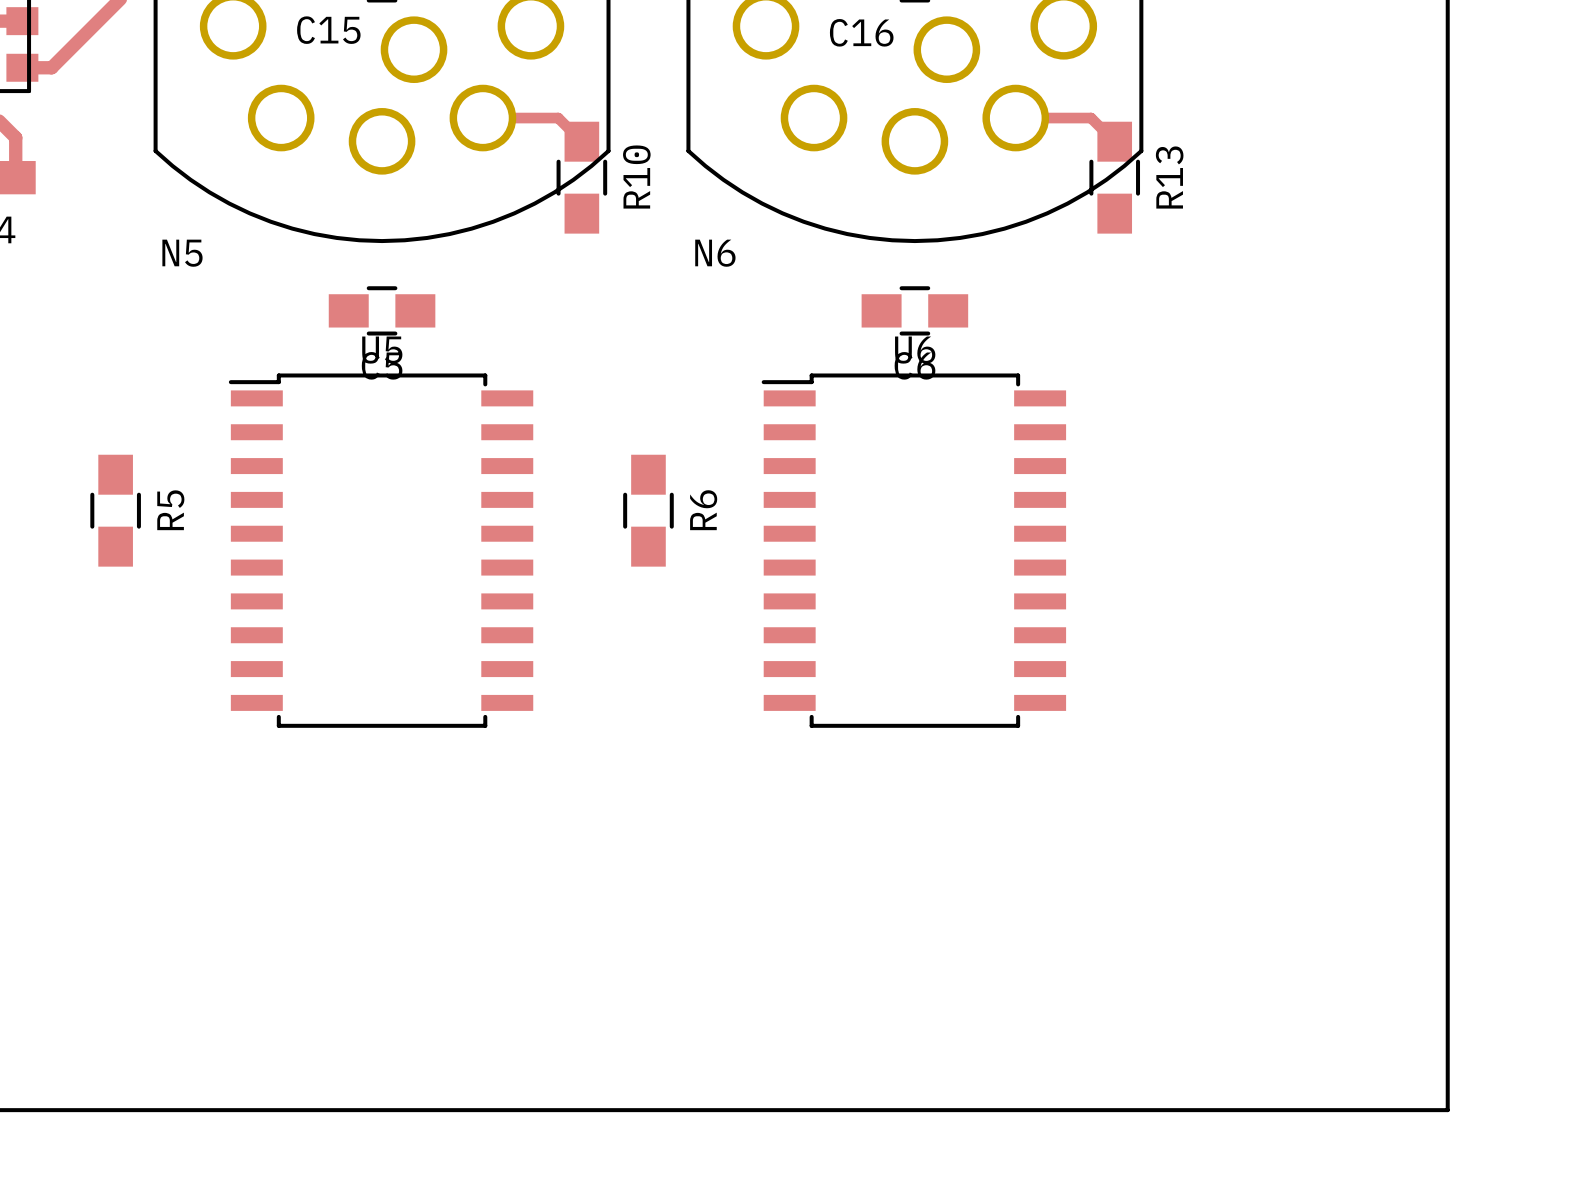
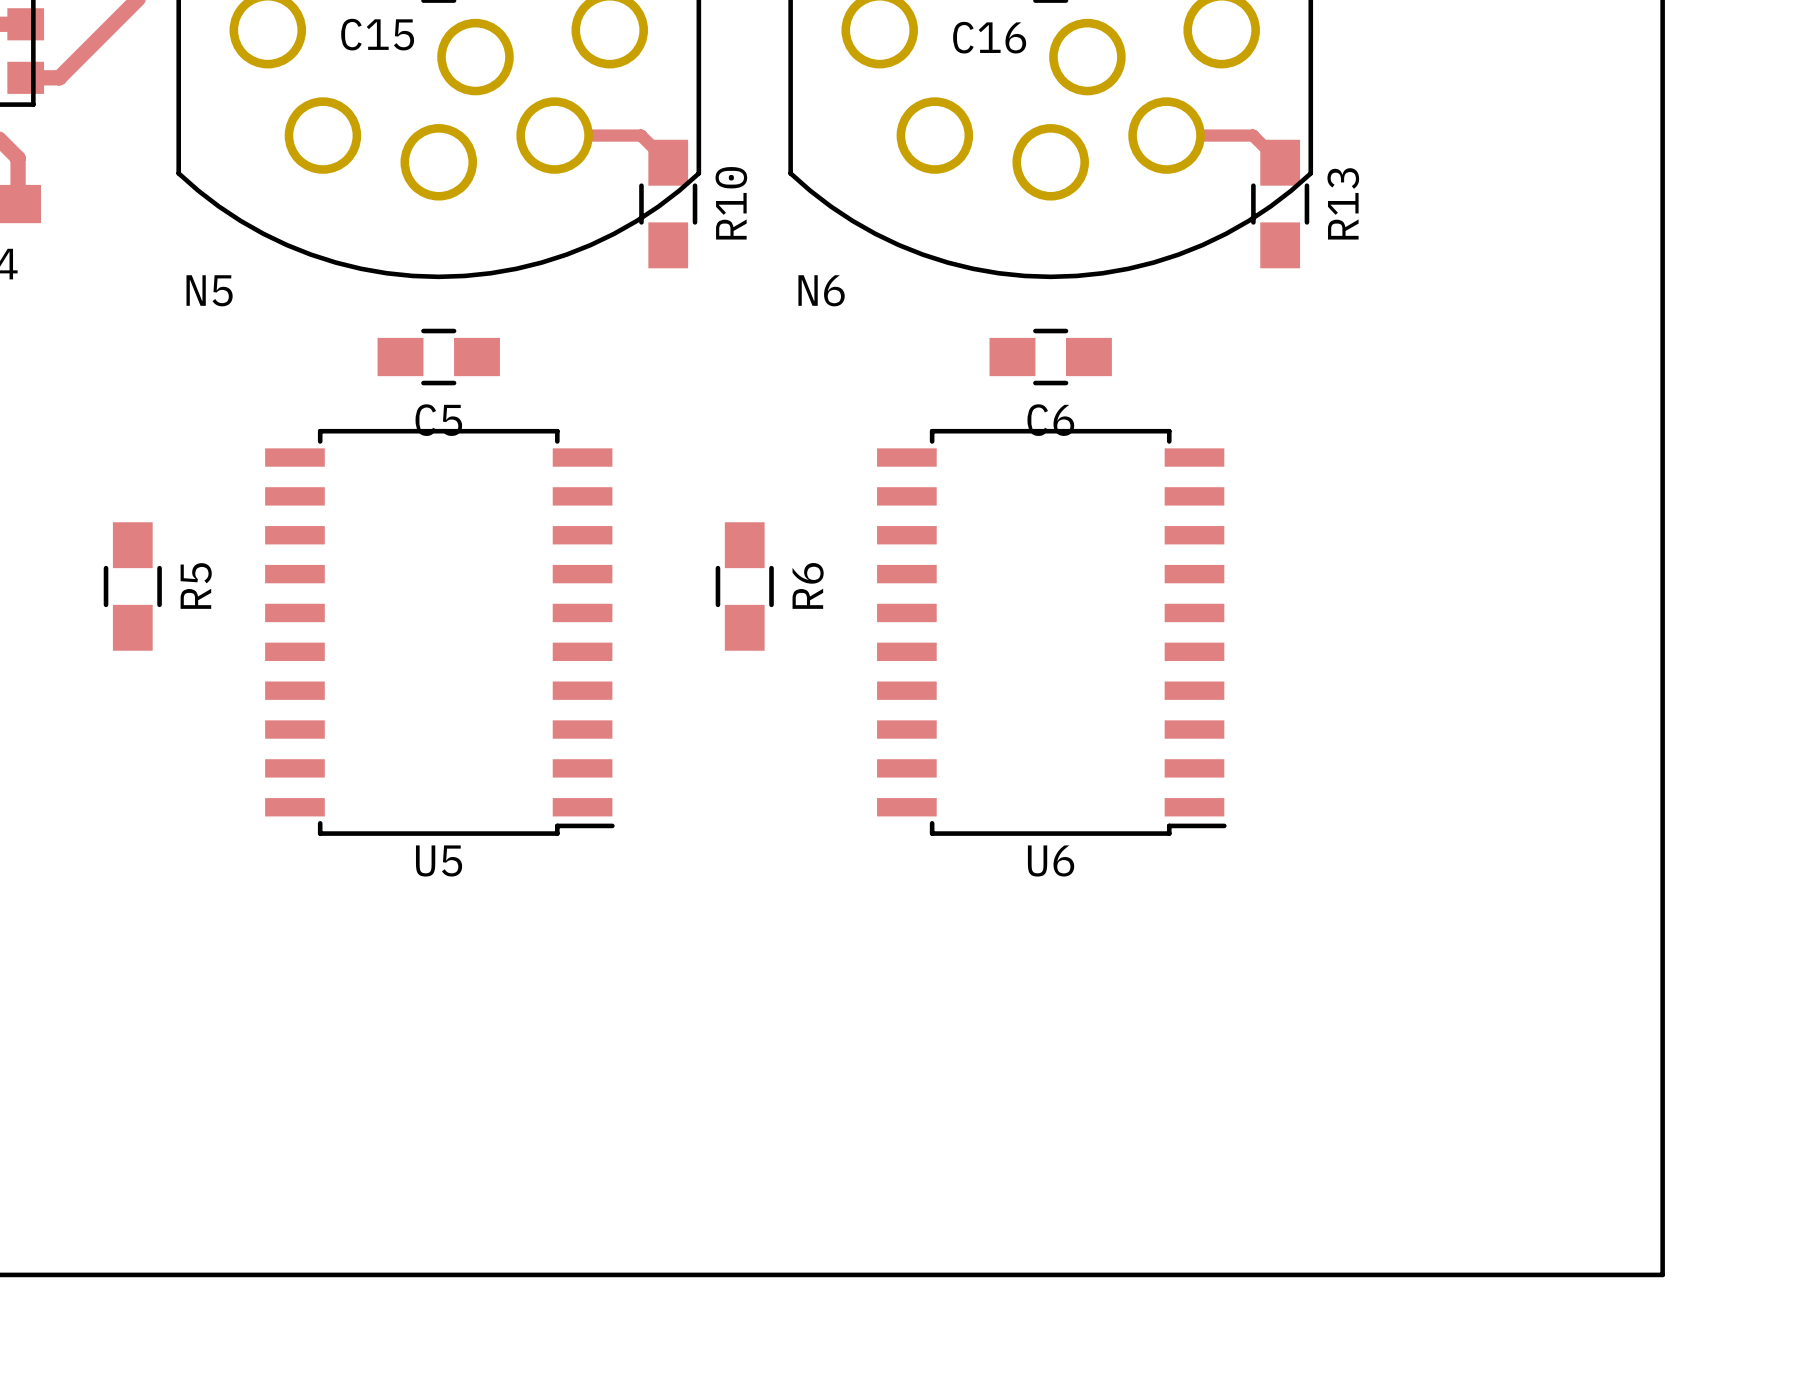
U5 rotation: 0° (381, 550) -> 180° (439, 632)
U6 rotation: 0° (913, 550) -> 180° (1051, 632)

